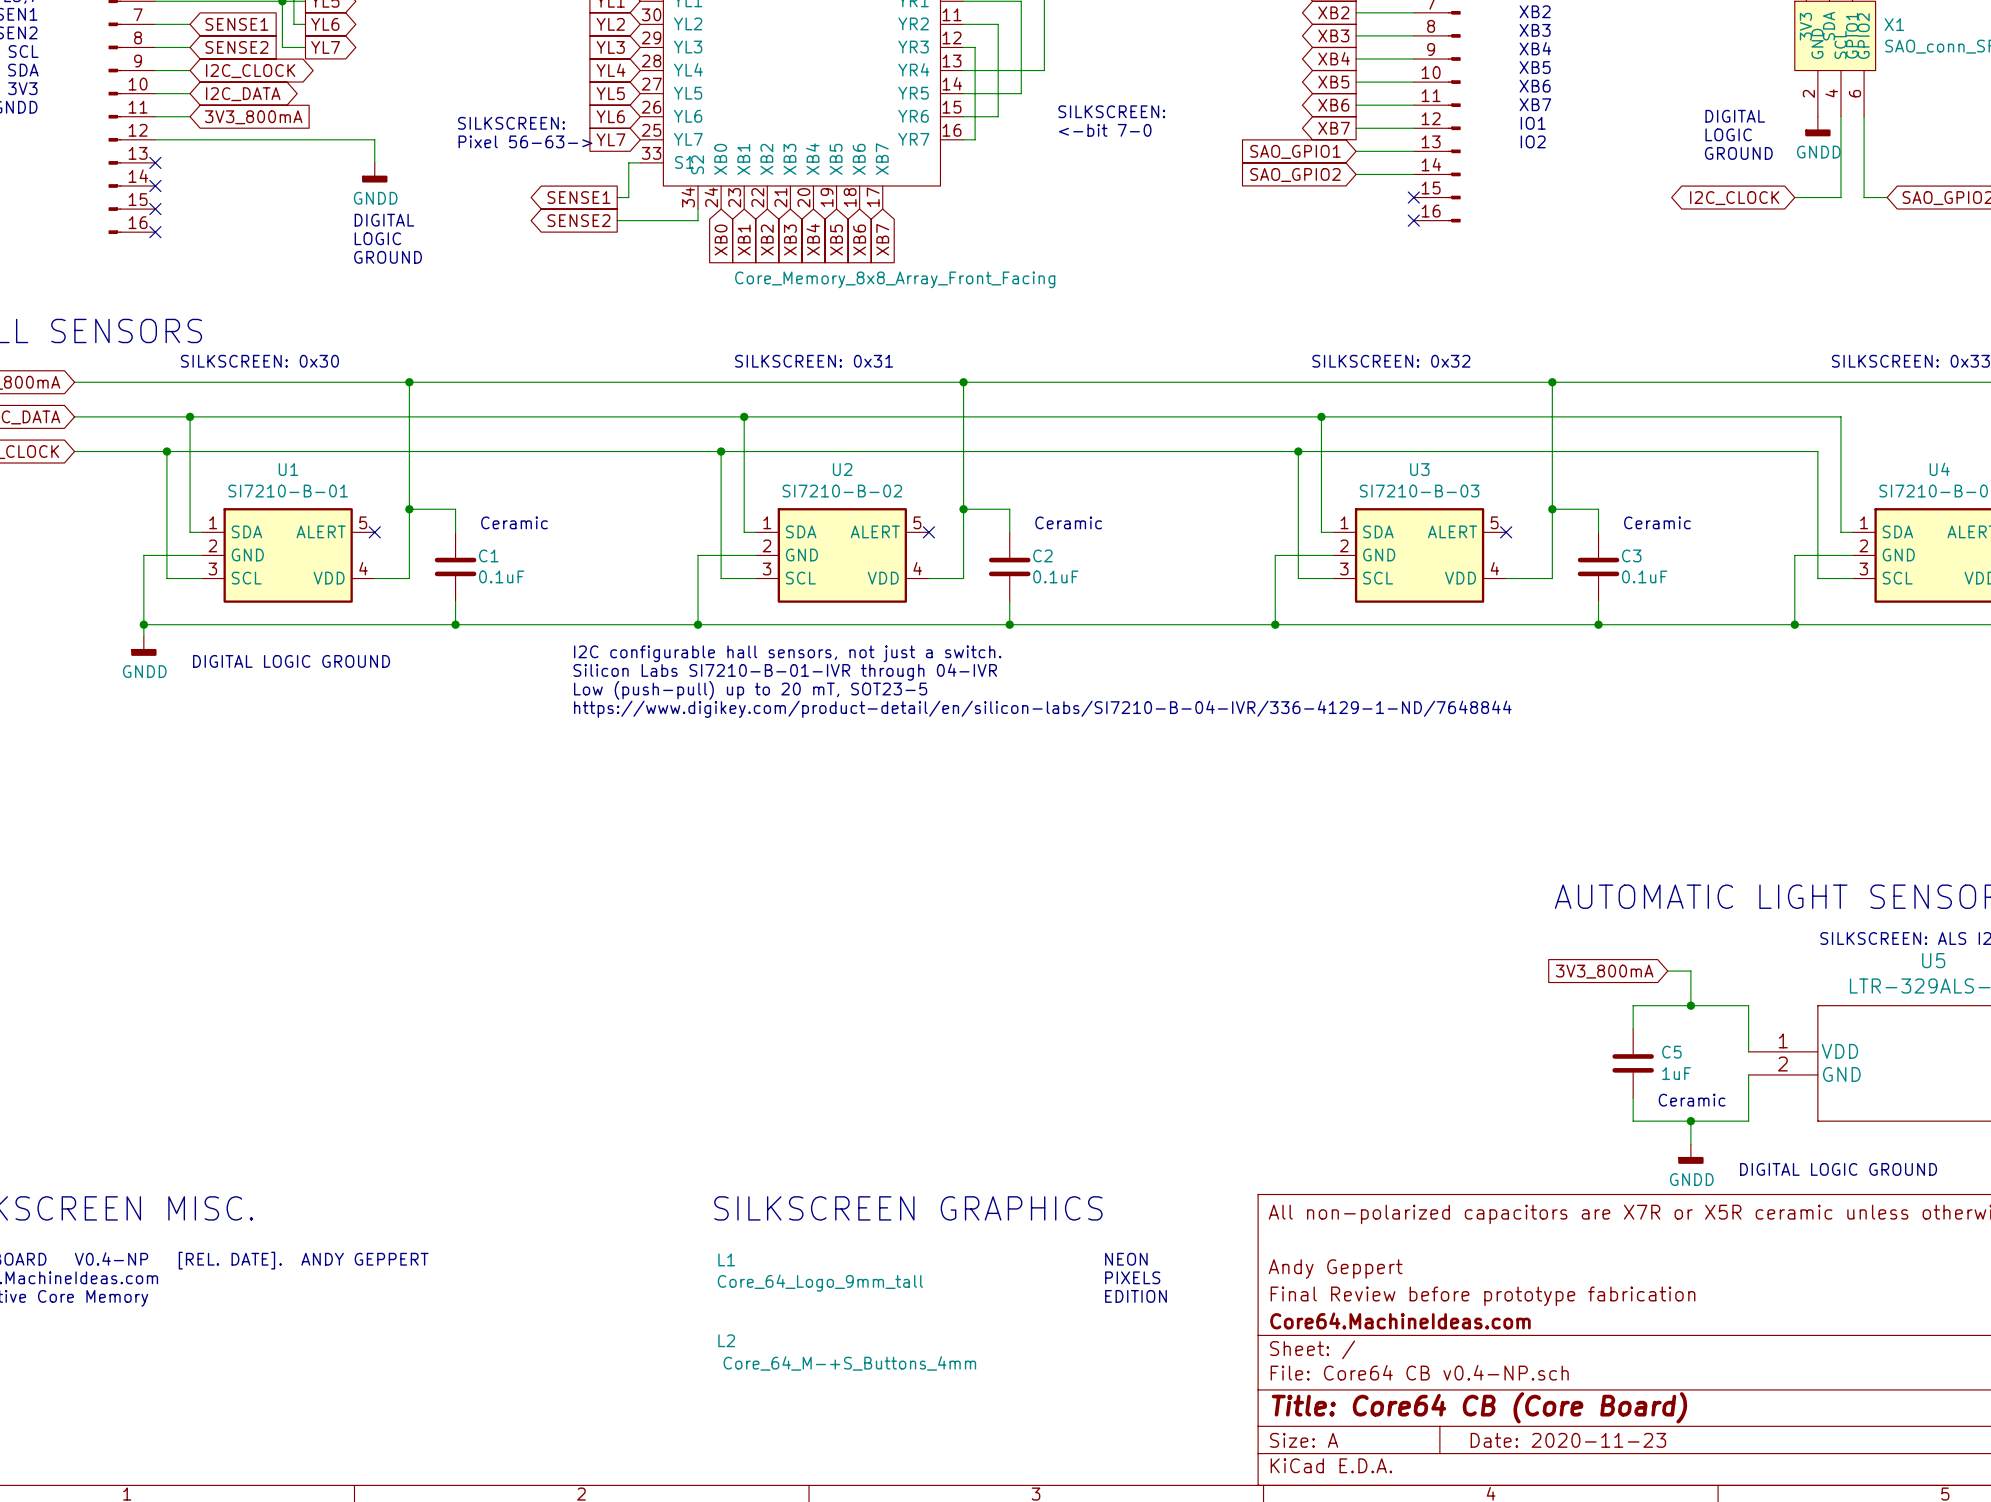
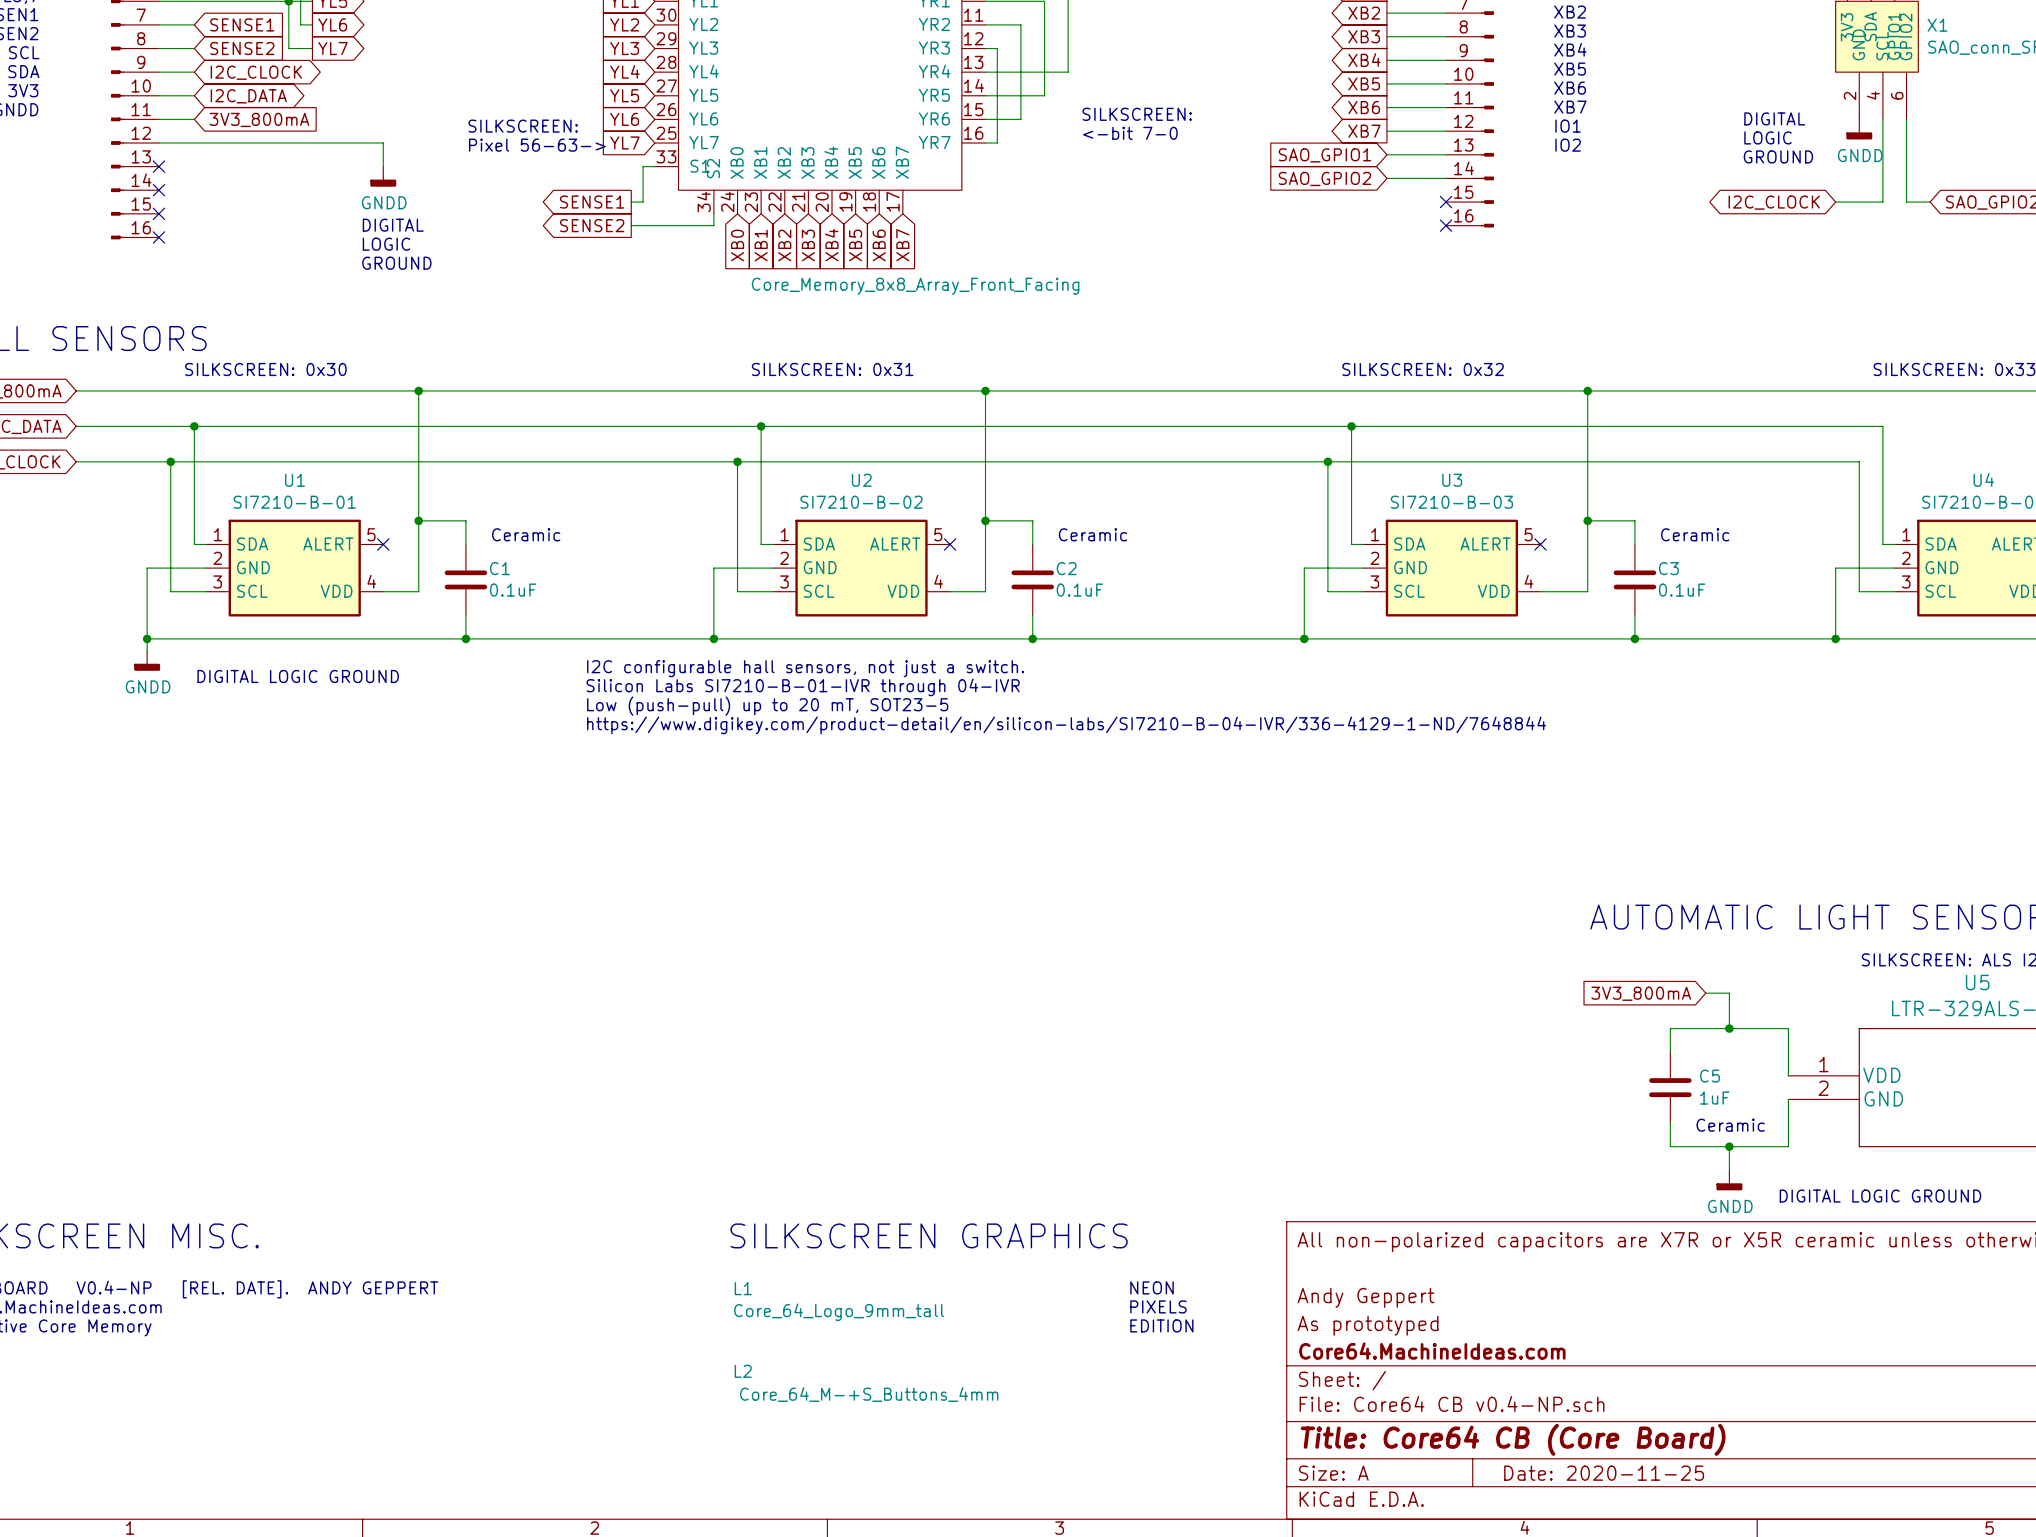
title block: Final Review before prototype fabrication (1483, 1296) -> As prototyped (1368, 1325)
title block: Date: 2020-11-23 (1568, 1440) -> Date: 2020-11-25 (1604, 1473)

